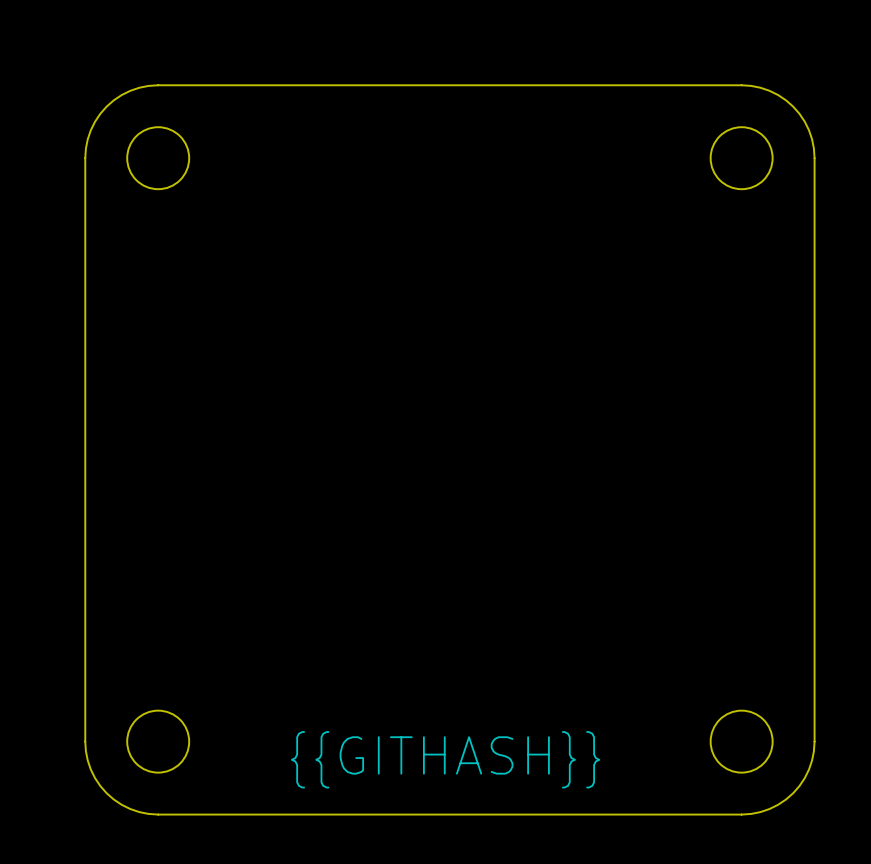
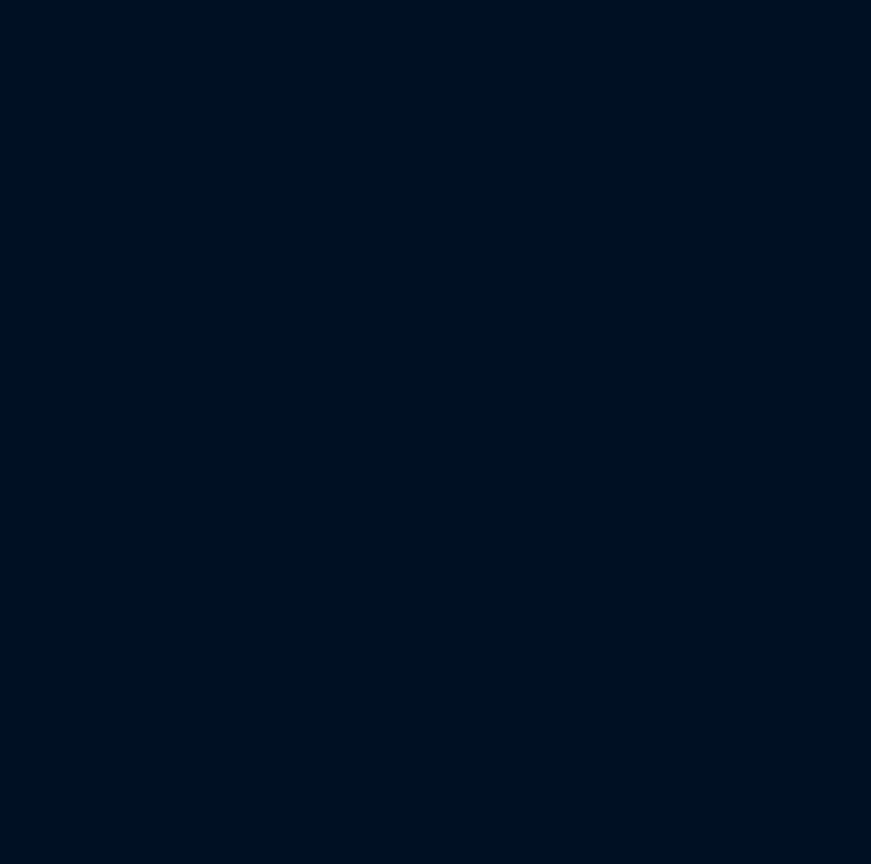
board edge: (158, 85) (741, 85) (769, 90) (793, 106) (809, 130) (814, 158) (814, 741) (809, 769) (793, 793) (769, 809) (741, 814) (158, 814) (130, 809) (106, 793) (90, 769) (85, 741) (85, 148) (95, 121) (106, 106) (130, 90) (158, 85) -> none
round board edge: [126, 126, 191, 191] -> none
round board edge: [709, 126, 774, 191] -> none
round board edge: [126, 709, 191, 774] -> none
round board edge: [709, 709, 774, 774] -> none
text: {{GITHASH}} (445, 759) -> none

